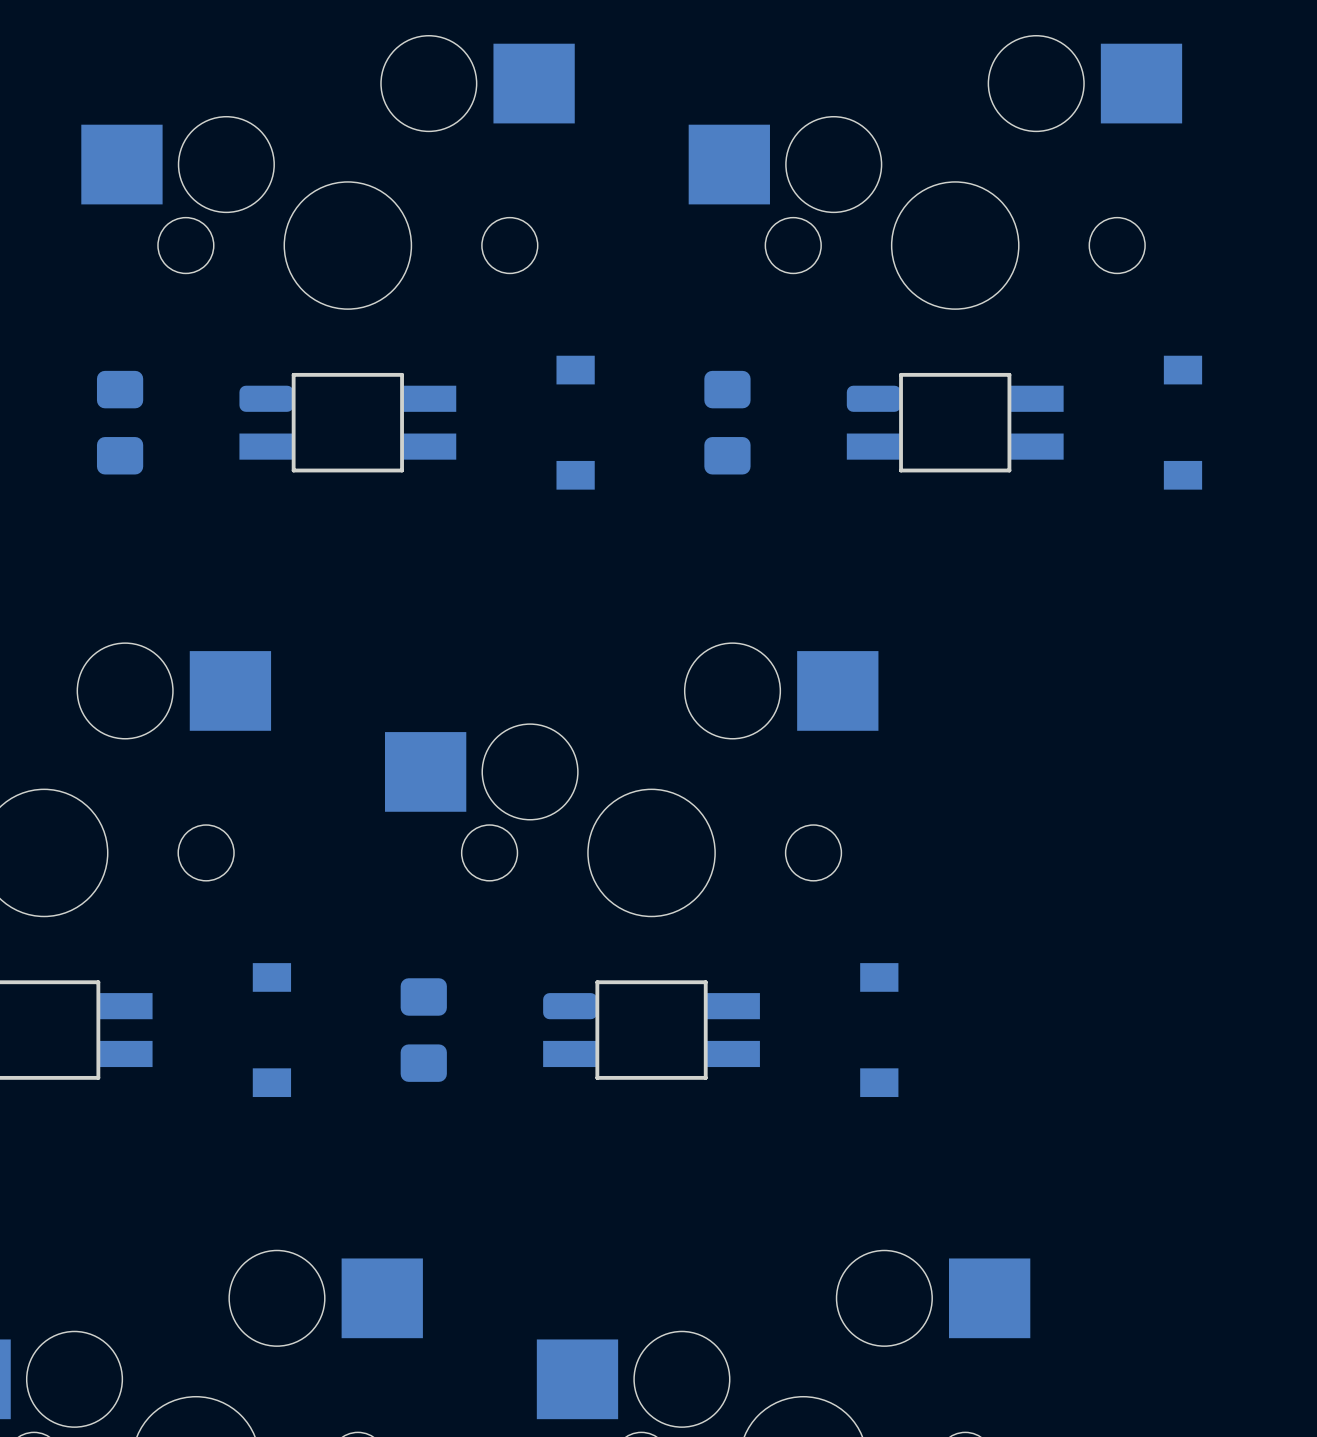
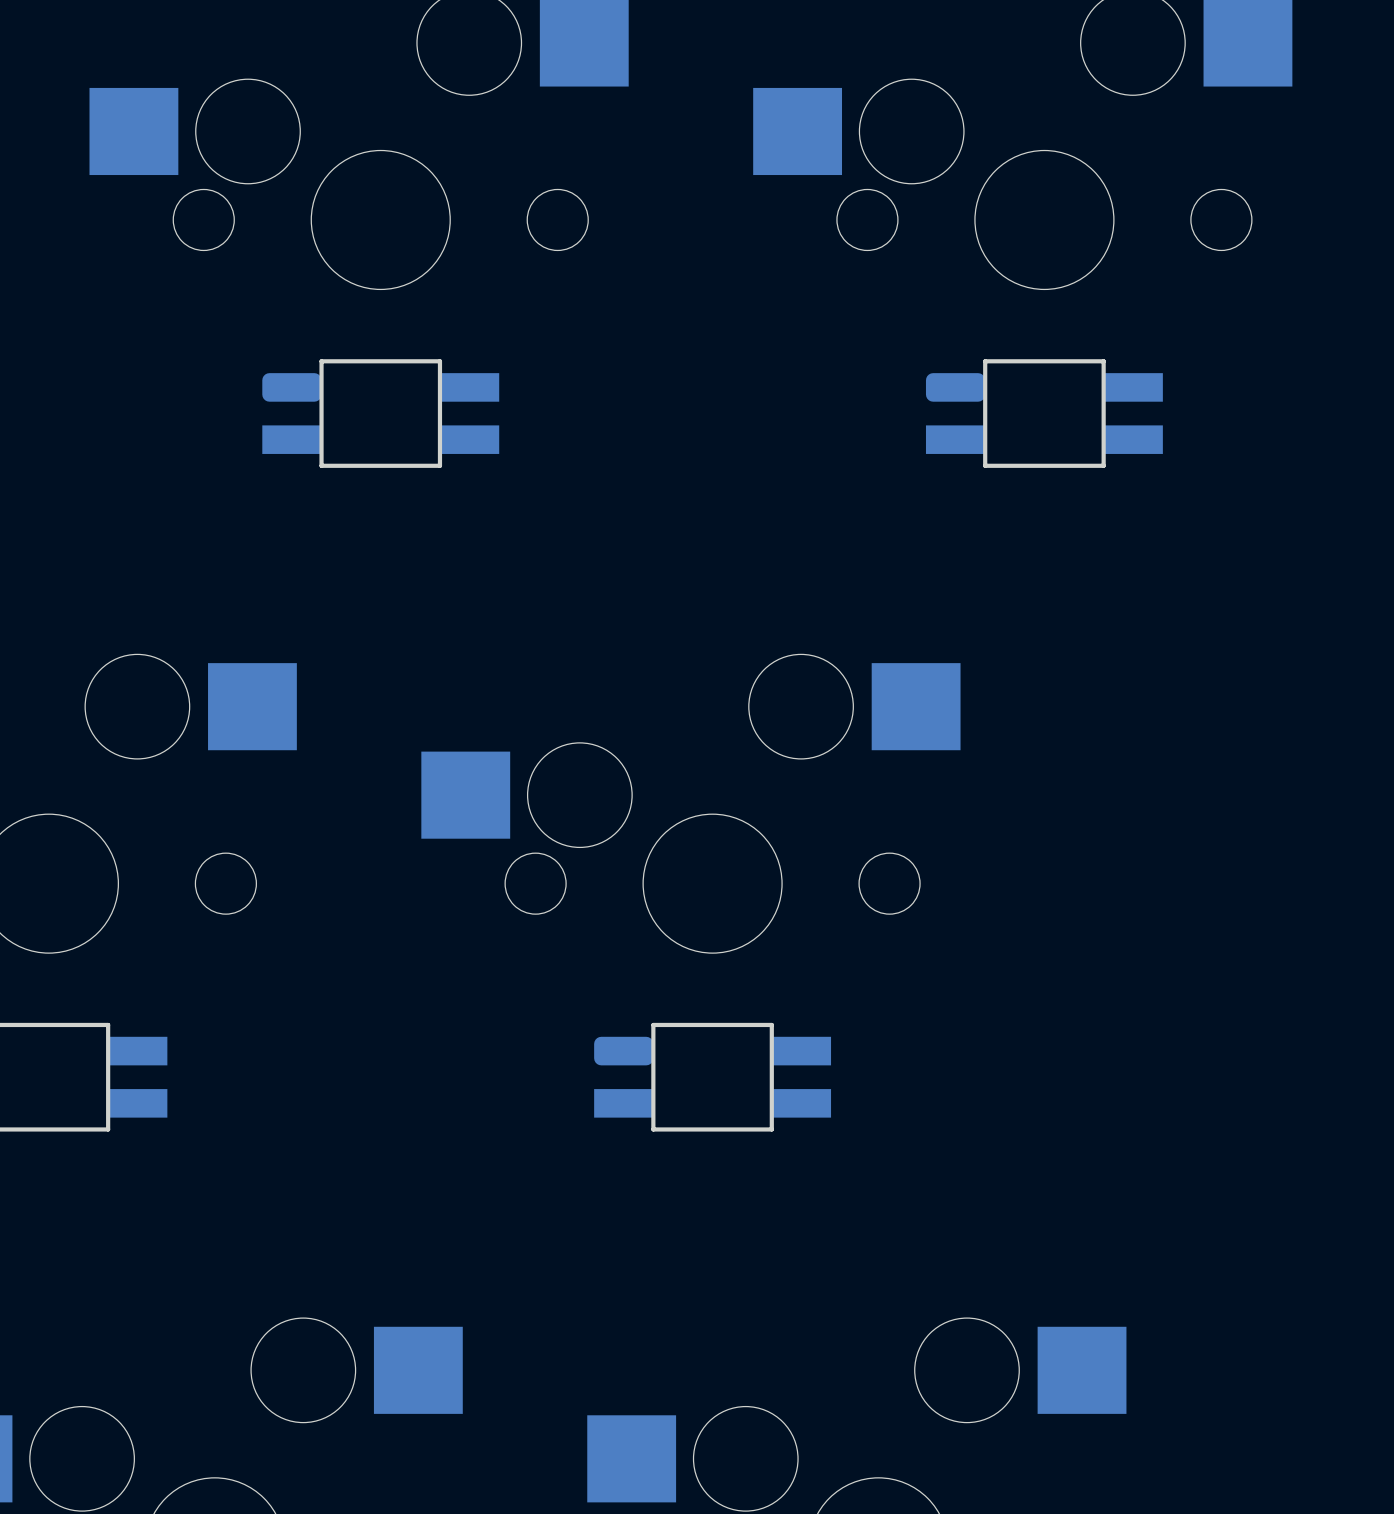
part: (120, 422) -> none
part: (575, 422) -> none
part: (727, 422) -> none
part: (1182, 422) -> none
part: (271, 1030) -> none
part: (423, 1030) -> none
part: (879, 1030) -> none

